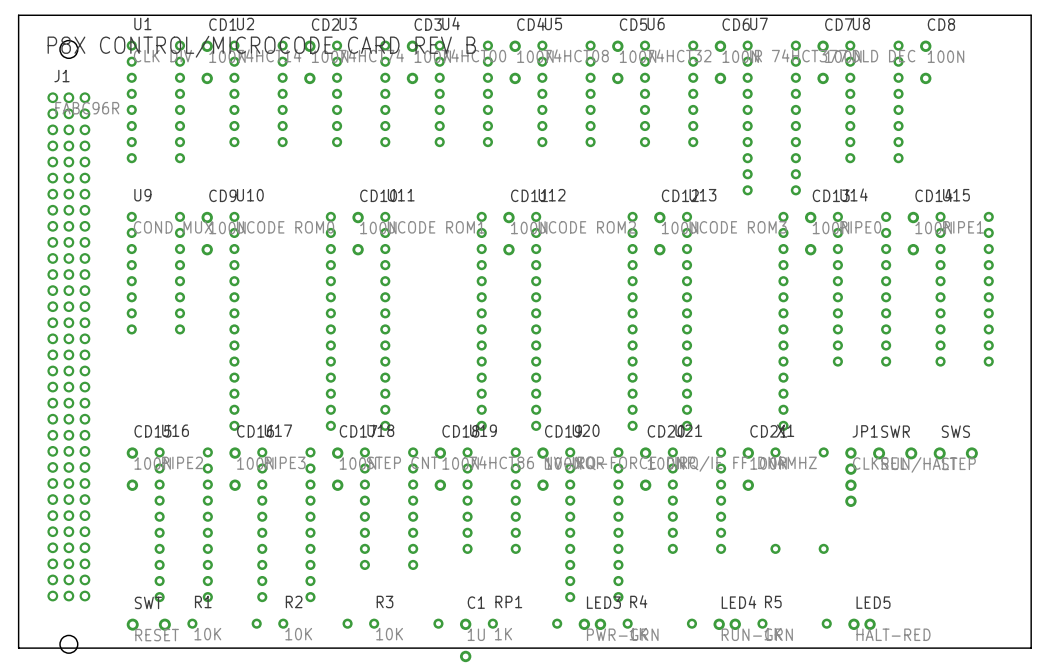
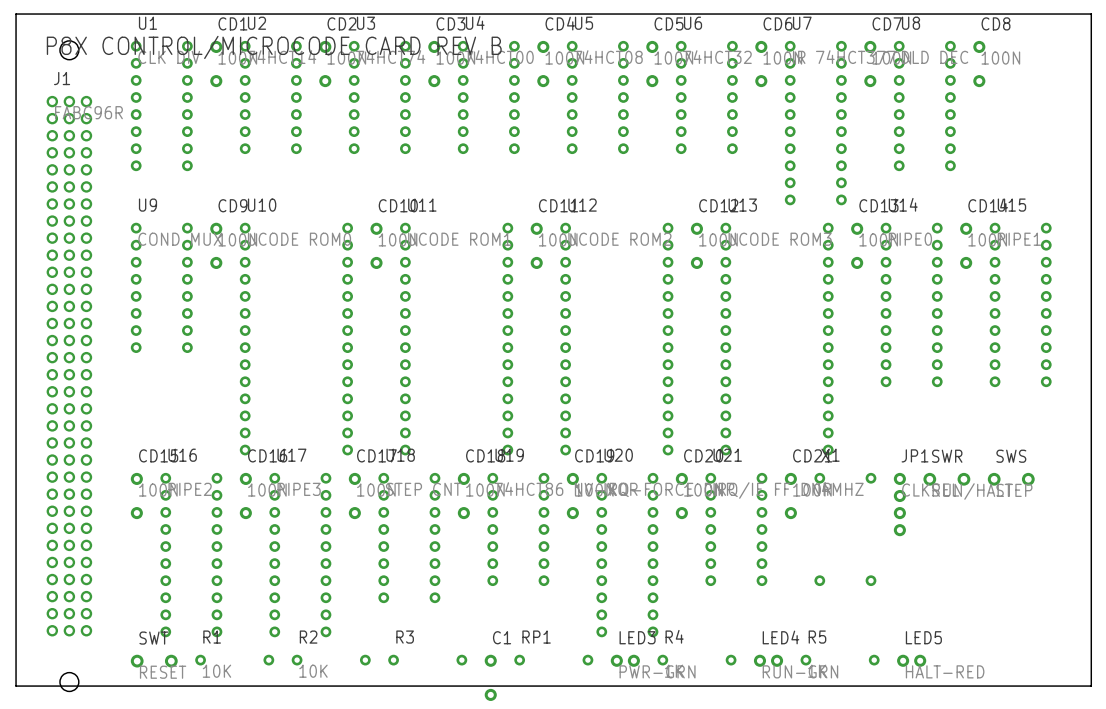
R3 value: 10K (389, 634) -> none
C1 value: 1U (476, 634) -> none
RP1 value: 1K (503, 634) -> none

